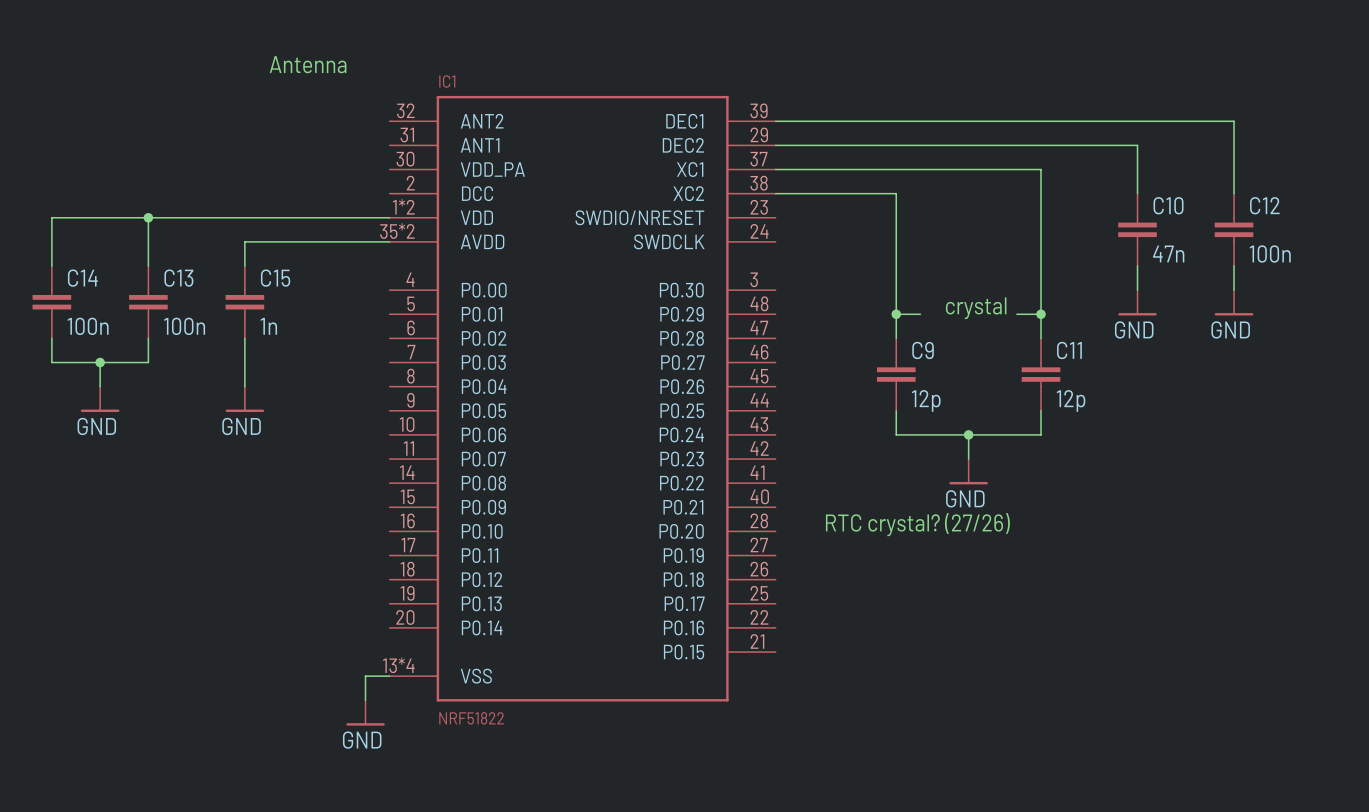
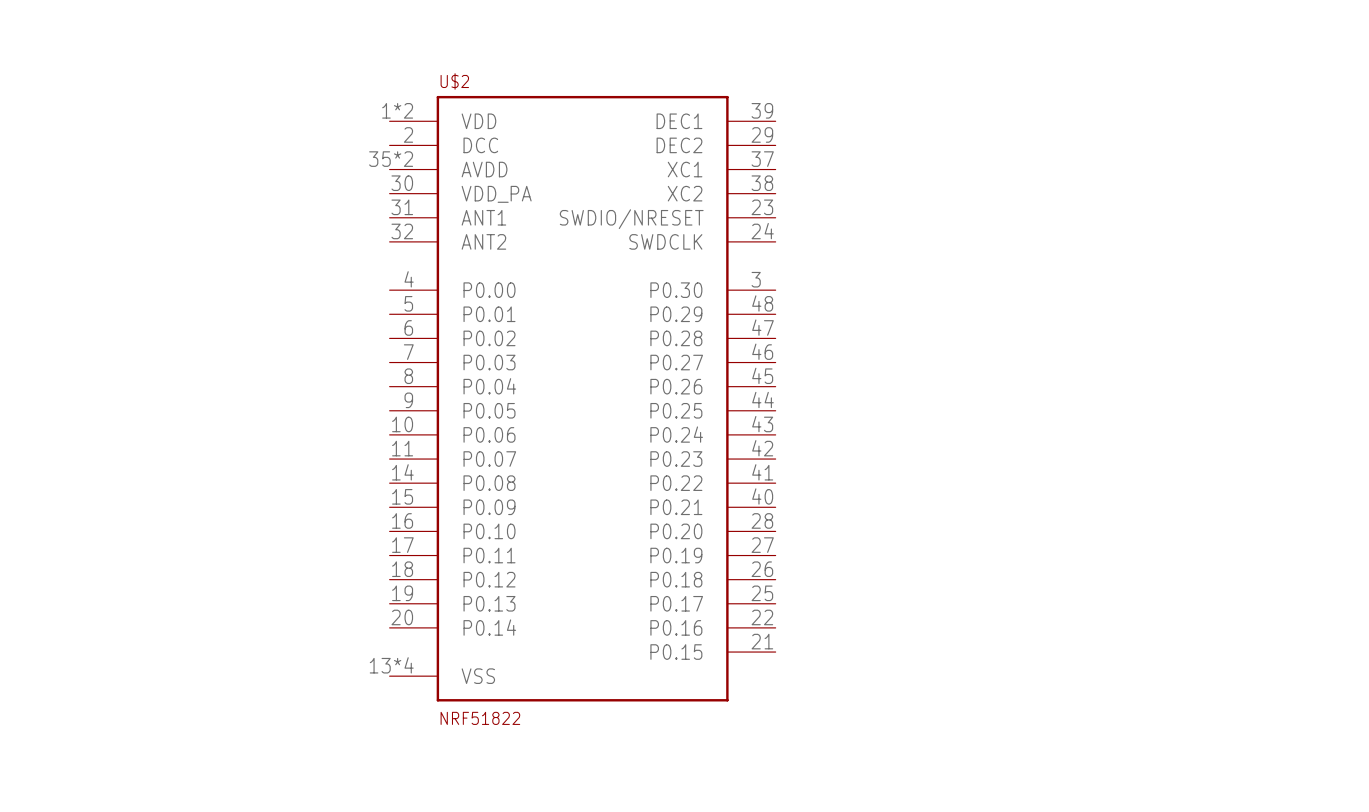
text: Antenna (308, 64) -> none
IC1 name: IC1 (447, 81) -> U$2 (454, 81)
IC1 symbol: [389, 95, 776, 702] -> [389, 95, 776, 702]
wire: (775, 121) (1234, 121) (1234, 193) -> none
wire: (775, 145) (1137, 145) (1137, 193) -> none
wire: (775, 169) (1041, 169) (1041, 338) -> none
wire: (775, 193) (896, 193) (896, 338) -> none
wire: (148, 217) (148, 266) -> none
junction: (148, 217) -> none
wire: (389, 217) (51, 217) (51, 266) -> none
C10: 47n (1137, 229) -> none
C12: 100n (1234, 229) -> none
wire: (389, 241) (244, 241) (244, 266) -> none
wire: (1137, 266) (1137, 290) -> none
wire: (1234, 266) (1234, 290) -> none
C14: 100n (51, 302) -> none
C13: 100n (148, 302) -> none
C15: 1n (244, 302) -> none
power symbol: GND (1137, 302) -> none
power symbol: GND (1234, 302) -> none
text: crystal (976, 308) -> none
wire: (896, 314) (920, 314) -> none
junction: (896, 314) -> none
wire: (1016, 314) (1041, 314) -> none
junction: (1041, 314) -> none
wire: (51, 338) (51, 362) (148, 362) (148, 338) -> none
wire: (244, 338) (244, 386) -> none
wire: (100, 362) (100, 386) -> none
junction: (100, 362) -> none
C9: 12p (896, 374) -> none
C11: 12p (1041, 374) -> none
power symbol: GND (100, 399) -> none
power symbol: GND (244, 399) -> none
wire: (896, 410) (896, 434) (1041, 434) (1041, 410) -> none
wire: (968, 434) (968, 459) -> none
junction: (968, 434) -> none
power symbol: GND (968, 471) -> none
text: RTC crystal? (27/26) (917, 524) -> none
wire: (389, 676) (365, 676) (365, 700) -> none
power symbol: GND (365, 712) -> none

